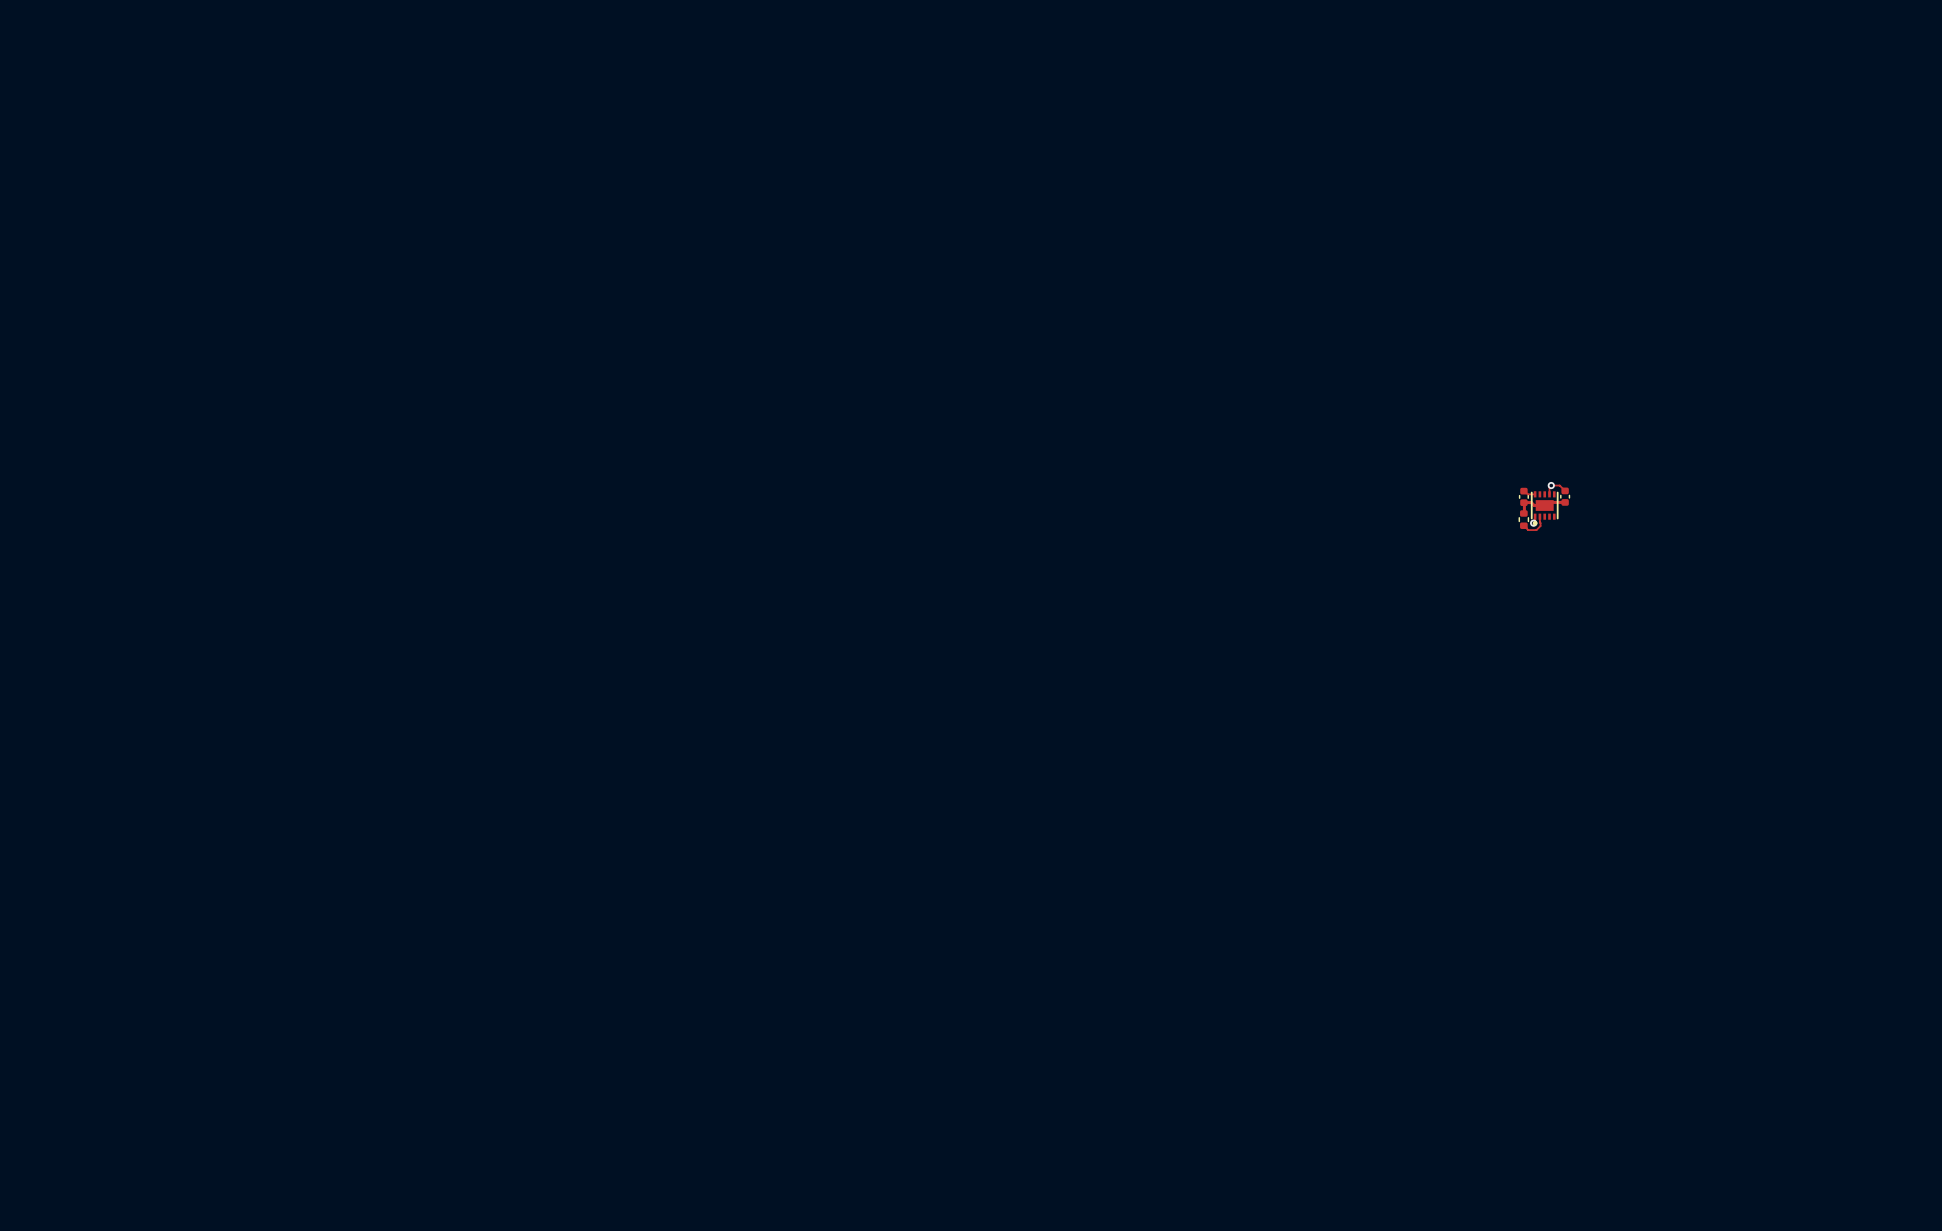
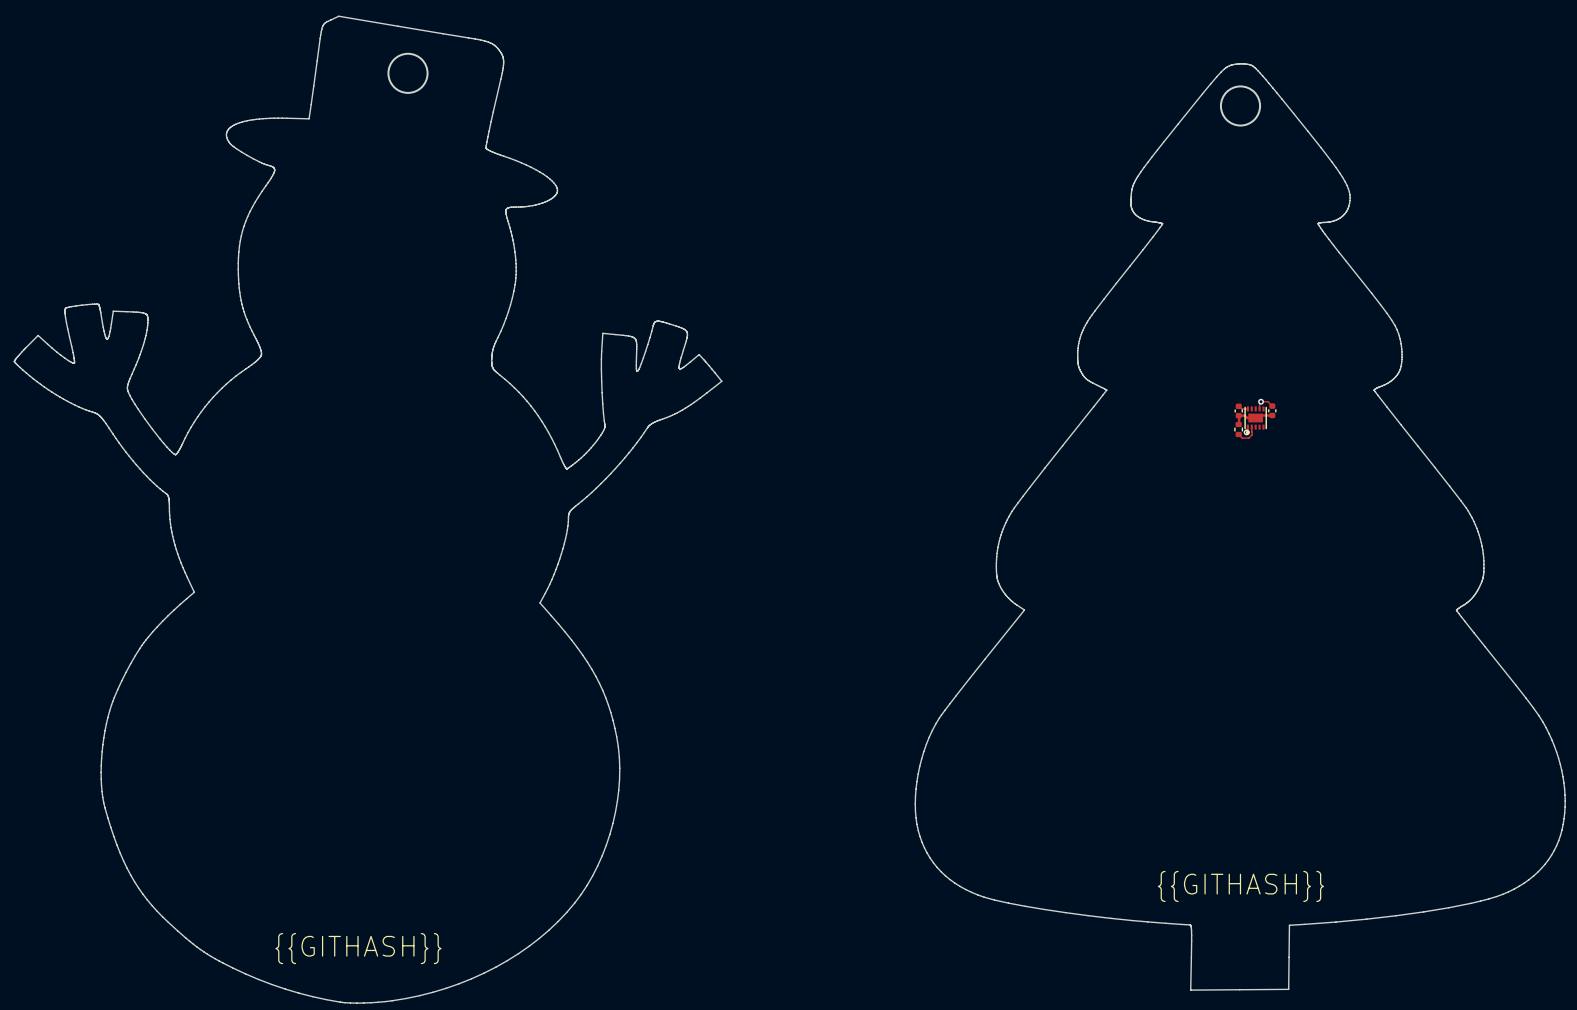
round board edge: none -> [387, 52, 429, 94]
round board edge: none -> [1219, 85, 1262, 127]
board edge: none -> (485, 147) (503, 64) (502, 54) (495, 45) (477, 39) (338, 16) (324, 23) (320, 34) (309, 118) (250, 120) (234, 125) (226, 132) (227, 139) (232, 145) (274, 169) (247, 216) (242, 231) (238, 251) (238, 279) (241, 300) (261, 354) (255, 361) (226, 384) (209, 401) (194, 421) (176, 454)
board edge: none -> (486, 148) (535, 169) (549, 178) (557, 188) (555, 195) (544, 202) (529, 206) (509, 207) (506, 209) (514, 252) (515, 278) (508, 311) (493, 349) (491, 362) (494, 370) (518, 392) (538, 416) (566, 468)
board edge: none -> (1162, 223) (1142, 219) (1133, 211) (1131, 198) (1134, 181) (1152, 156) (1216, 76) (1227, 66) (1240, 63) (1252, 65) (1262, 76) (1321, 148) (1346, 185) (1350, 200) (1345, 212) (1335, 220) (1318, 223)
board edge: none -> (1162, 223) (1091, 315) (1080, 336) (1077, 355) (1080, 370) (1087, 379) (1106, 390)
board edge: none -> (1318, 223) (1387, 313) (1398, 333) (1401, 351) (1400, 369) (1392, 380) (1374, 389)
board edge: none -> (98, 304) (65, 308) (74, 362)
board edge: none -> (98, 304) (107, 339) (113, 311) (140, 312) (147, 315) (145, 338) (127, 389) (152, 429) (175, 454)
board edge: none -> (14, 361) (38, 335) (60, 355) (74, 363)
board edge: none -> (14, 361) (52, 392) (75, 405) (98, 415) (136, 464) (167, 494) (174, 544) (194, 592) (162, 621) (139, 648) (117, 689) (106, 724) (101, 765) (102, 797) (113, 836) (130, 875) (142, 894) (162, 916) (193, 944) (214, 958) (245, 973) (285, 989) (326, 999) (356, 1003) (392, 1000) (432, 992) (471, 978) (507, 960) (539, 938) (566, 912) (587, 885) (602, 855) (612, 823) (618, 790) (619, 757) (612, 720) (602, 690) (587, 662) (540, 602) (559, 559) (570, 510) (615, 468) (649, 425) (685, 408) (721, 381) (699, 354) (679, 368) (687, 332) (681, 327) (659, 321) (653, 323) (637, 371)
board edge: none -> (636, 371) (636, 344) (634, 338) (602, 333) (601, 381) (604, 427) (588, 450) (566, 468)
board edge: none -> (1106, 390) (1023, 495) (1007, 519) (997, 547) (997, 578) (1006, 595) (1024, 610) (939, 718) (929, 737) (921, 758) (915, 803) (920, 836) (933, 862) (945, 875) (960, 886) (984, 897) (1025, 906) (1110, 918) (1190, 924) (1190, 990) (1288, 989) (1289, 925) (1366, 919) (1423, 911) (1480, 901) (1514, 889) (1541, 868) (1551, 855) (1558, 840) (1565, 807) (1561, 770) (1551, 739) (1538, 715) (1456, 610)
board edge: none -> (1374, 390) (1460, 500) (1476, 528) (1483, 553) (1482, 578) (1472, 597) (1456, 610)
text: none -> {{GITHASH}} (1240, 886)
text: none -> {{GITHASH}} (358, 948)

